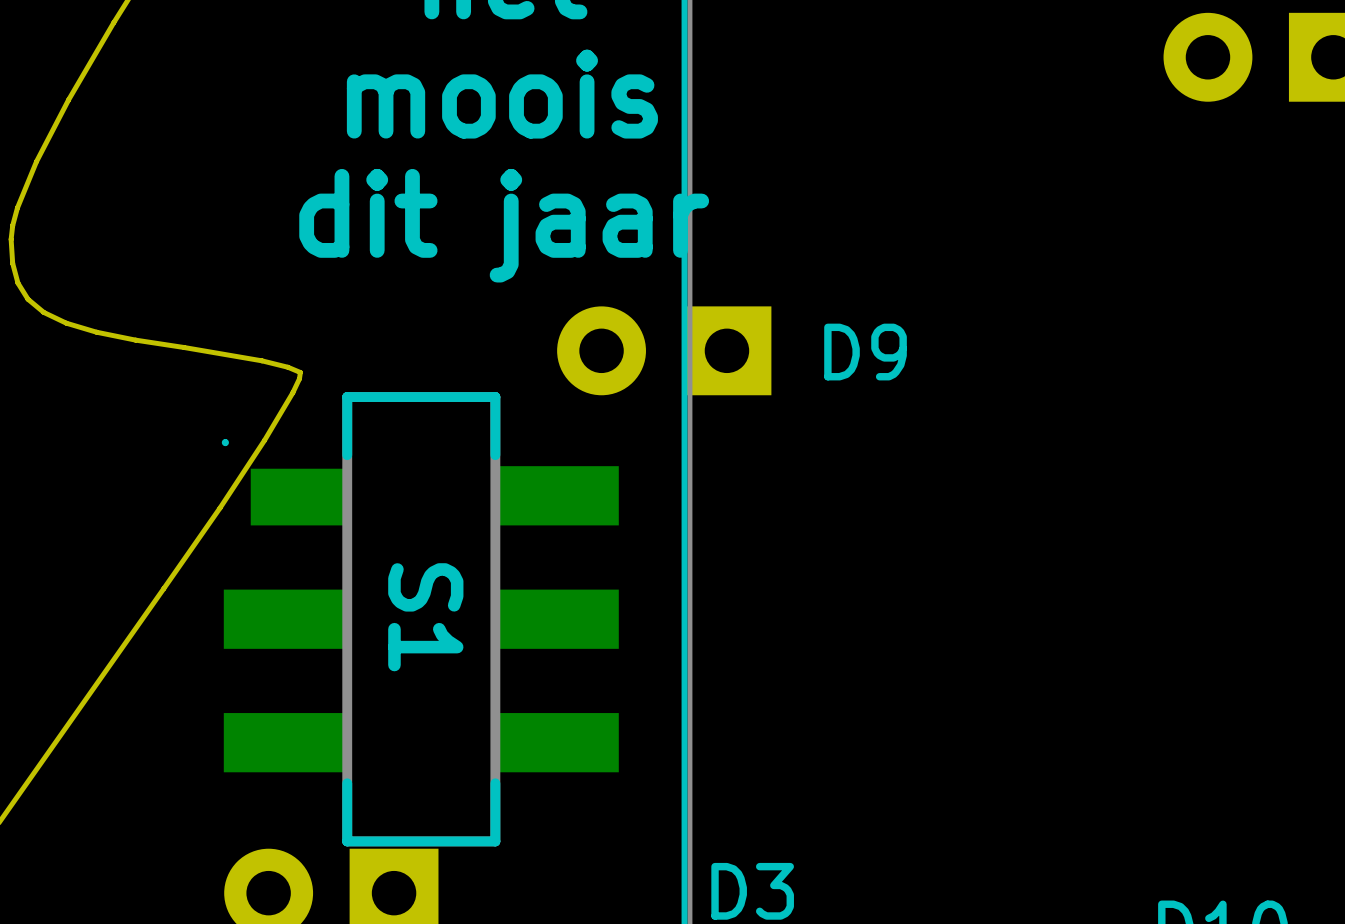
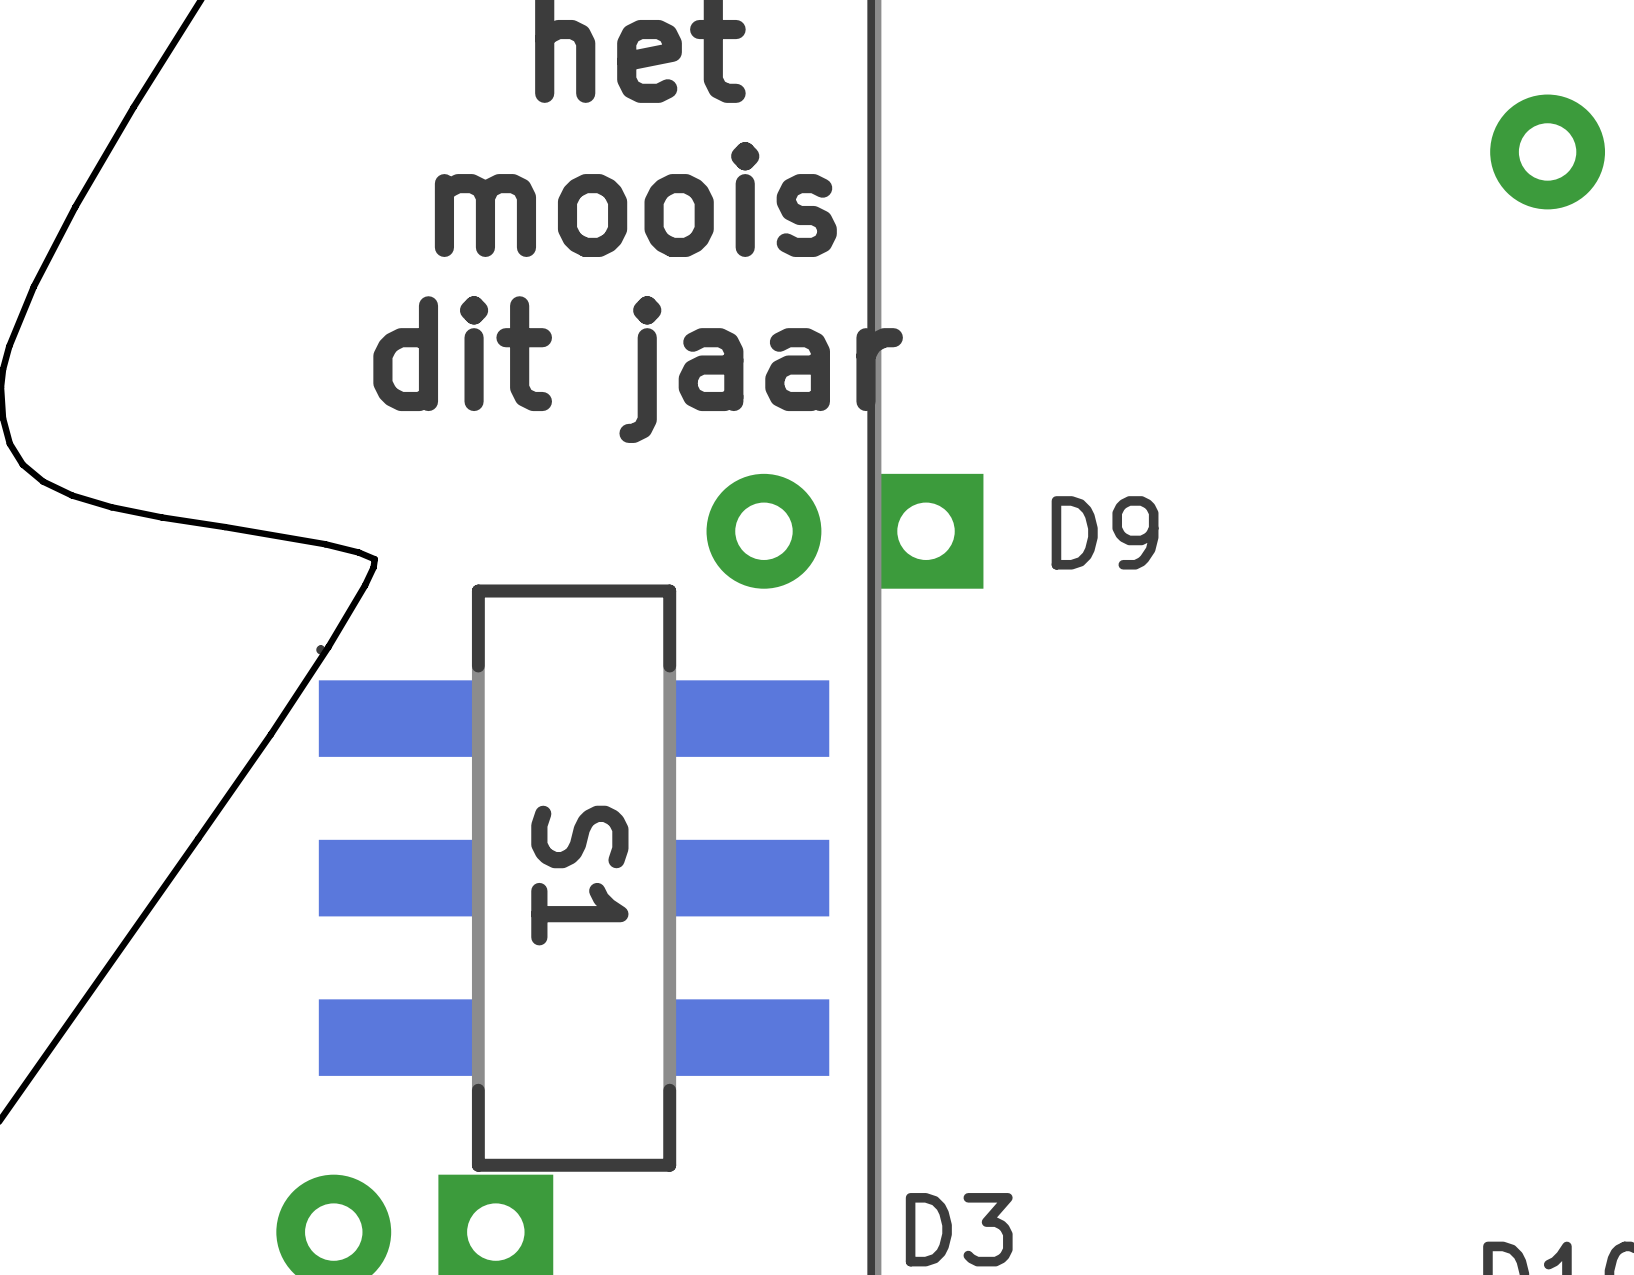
S1 footprint: [221, 392, 619, 847] -> [316, 584, 830, 1172]
S1 name position: S1 (425, 617) -> S1 (579, 875)

